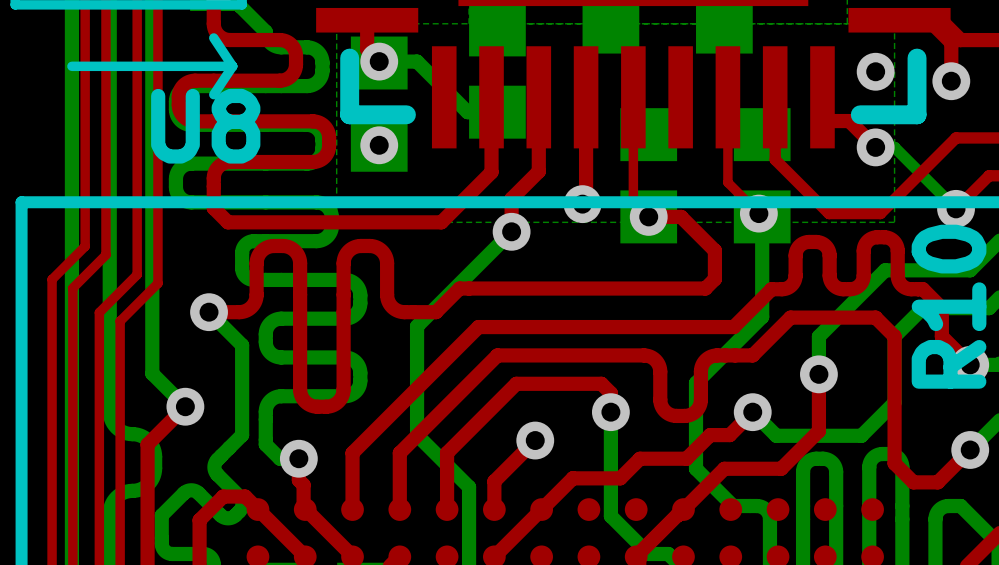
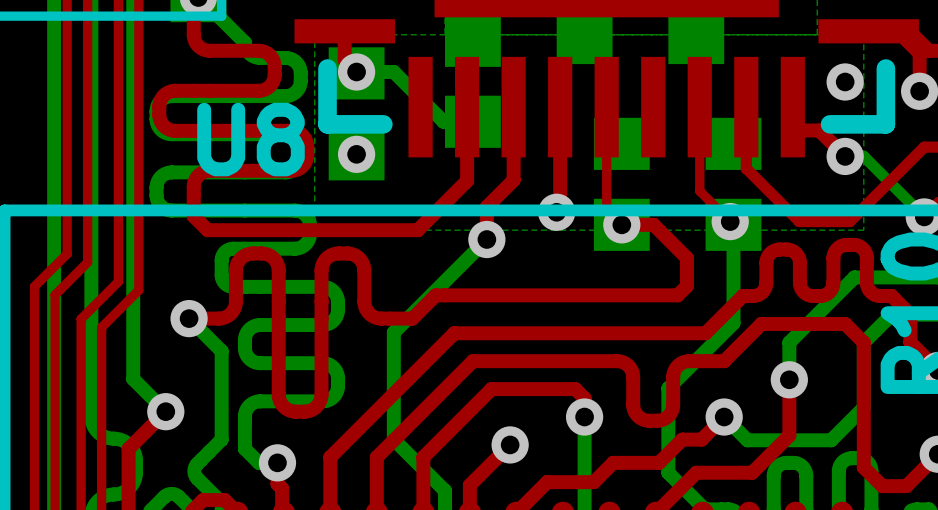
line: (213, 37) (232, 66) -> none
line: (71, 66) (232, 66) -> none
line: (232, 66) (213, 94) -> none
U8 name position: U8 (205, 126) -> U8 (250, 139)

